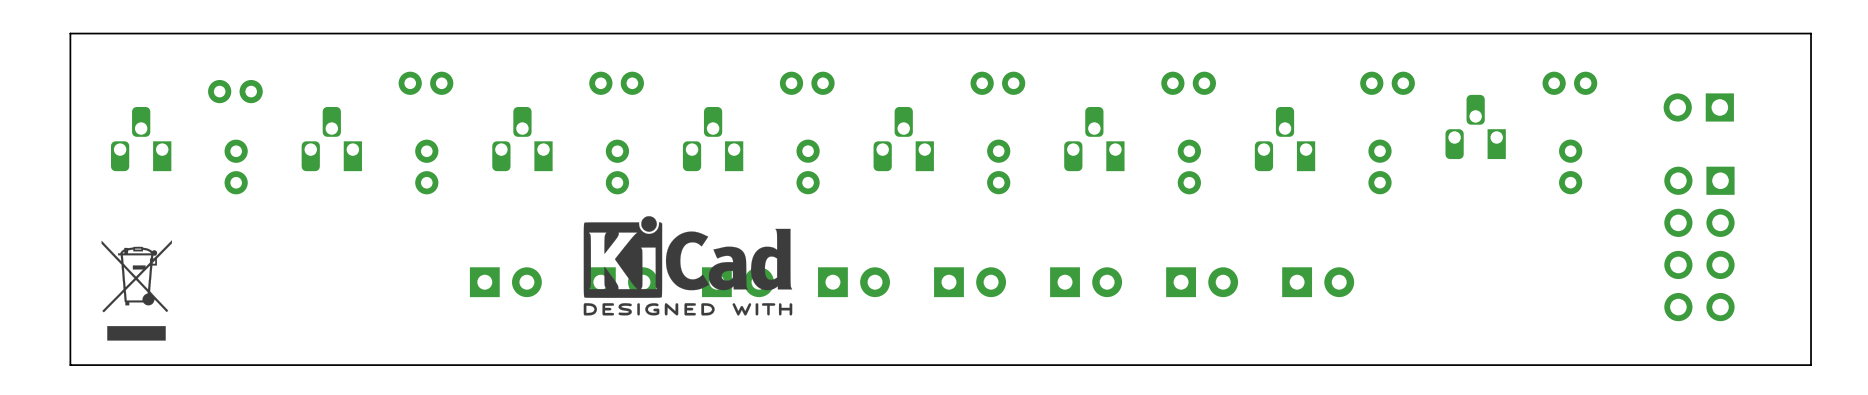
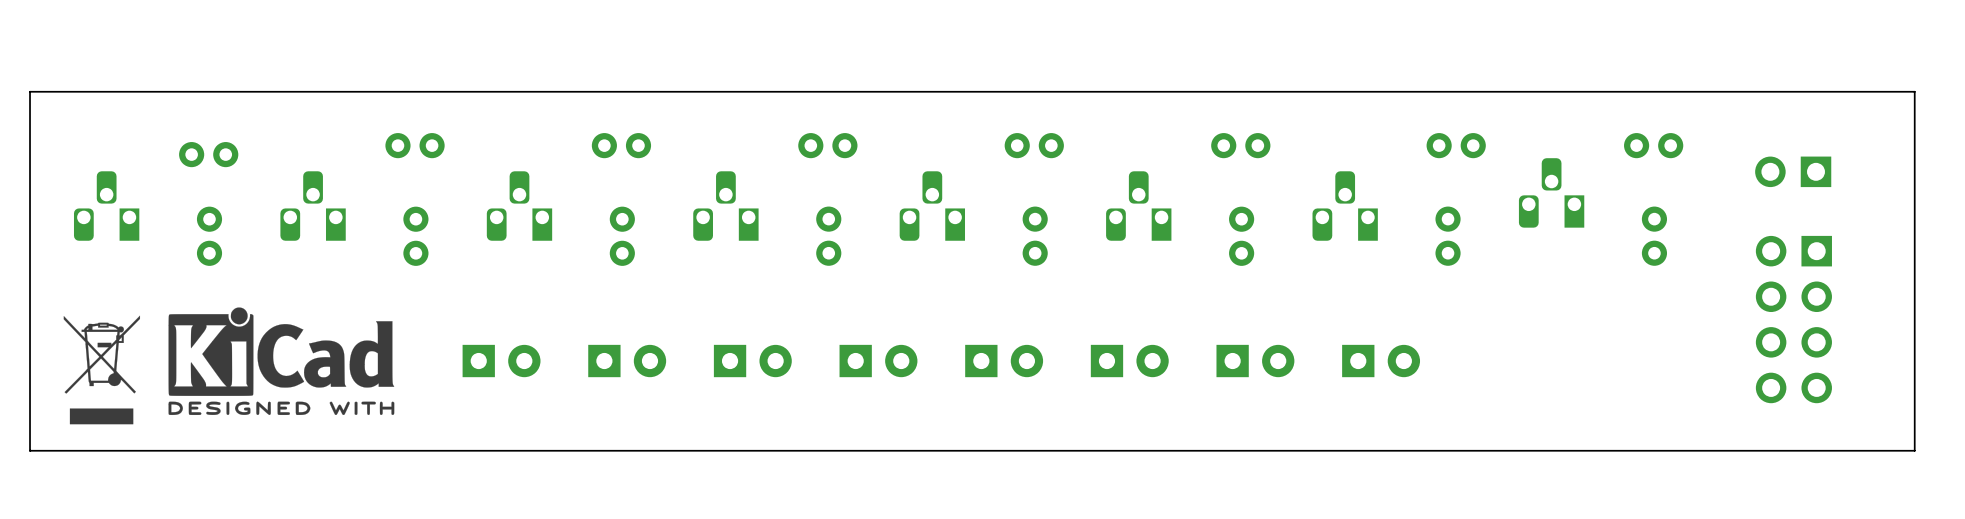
drawing position: (687, 265) -> (281, 361)

